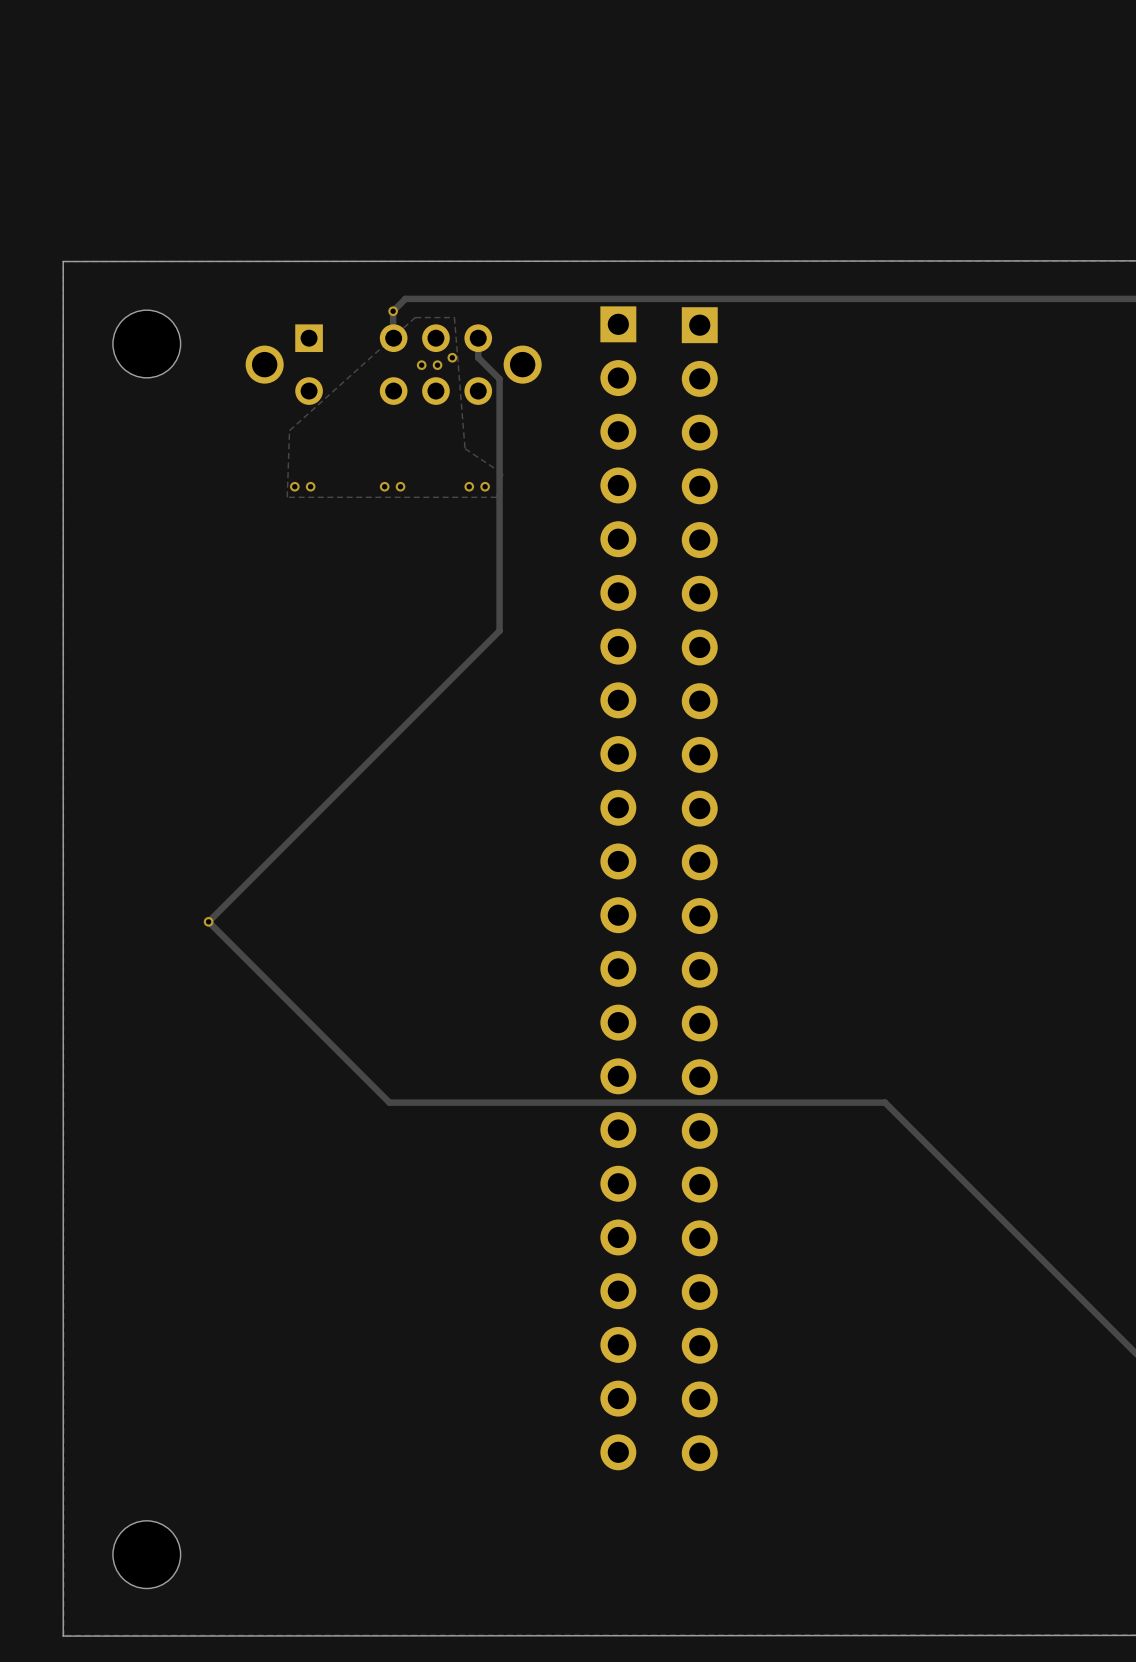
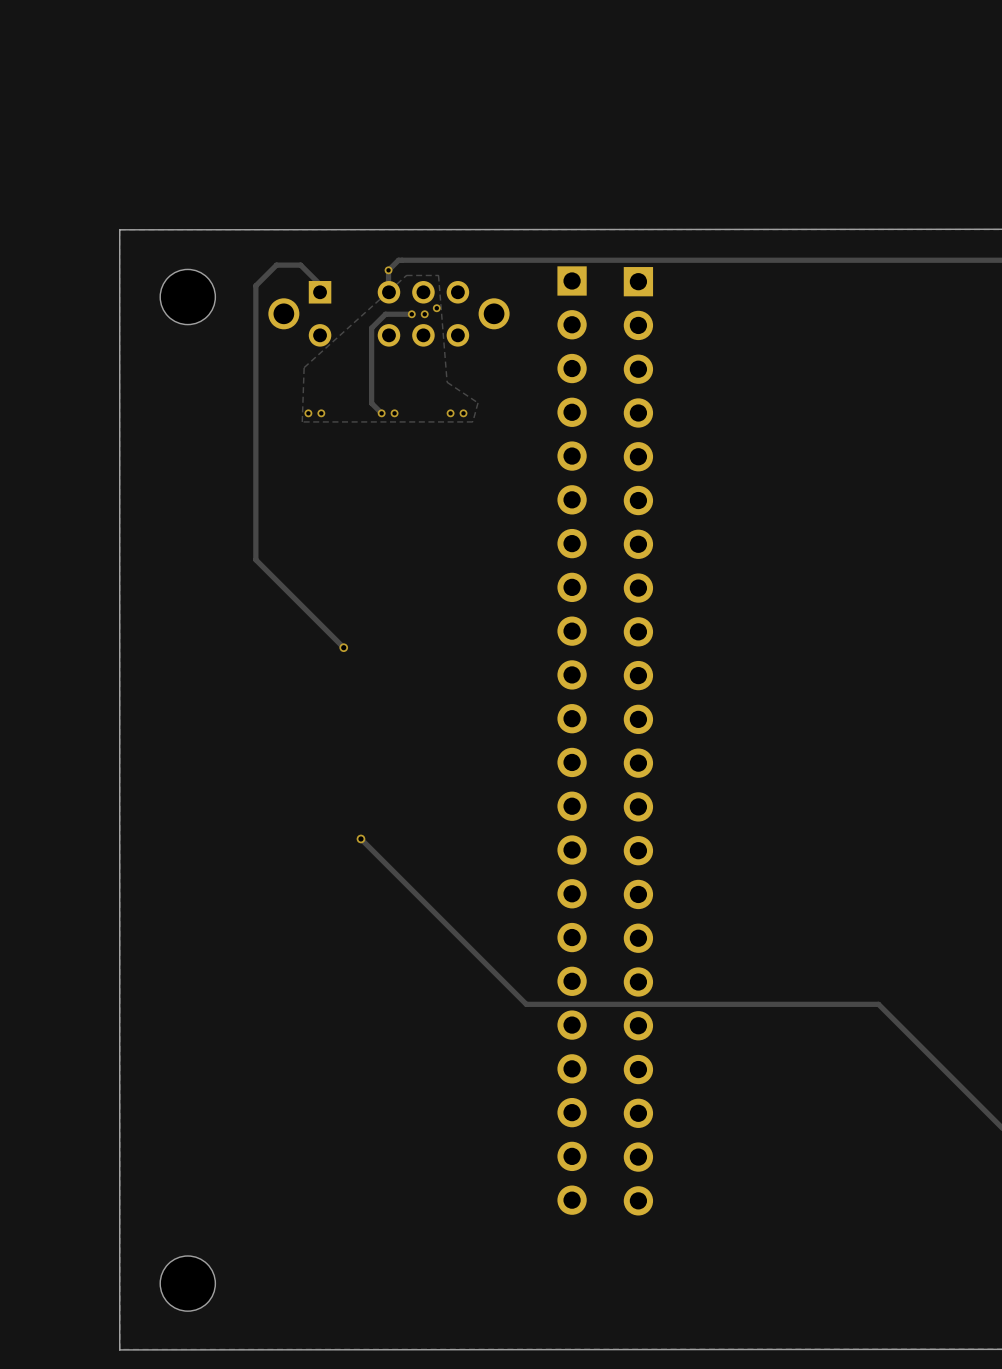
track: none -> (320, 292) (320, 284) (300, 265) (276, 265) (255, 285) (255, 559) (343, 647)
track: (478, 338) (478, 357) (499, 379) (499, 630) (208, 921) (389, 1102) (885, 1102) (994, 1212) -> (360, 838) (526, 1004) (878, 1004)
track: none -> (411, 314) (385, 314) (371, 328) (371, 403) (381, 413)
via: none -> (343, 647)
via: (208, 921) -> none
via: none -> (360, 838)

